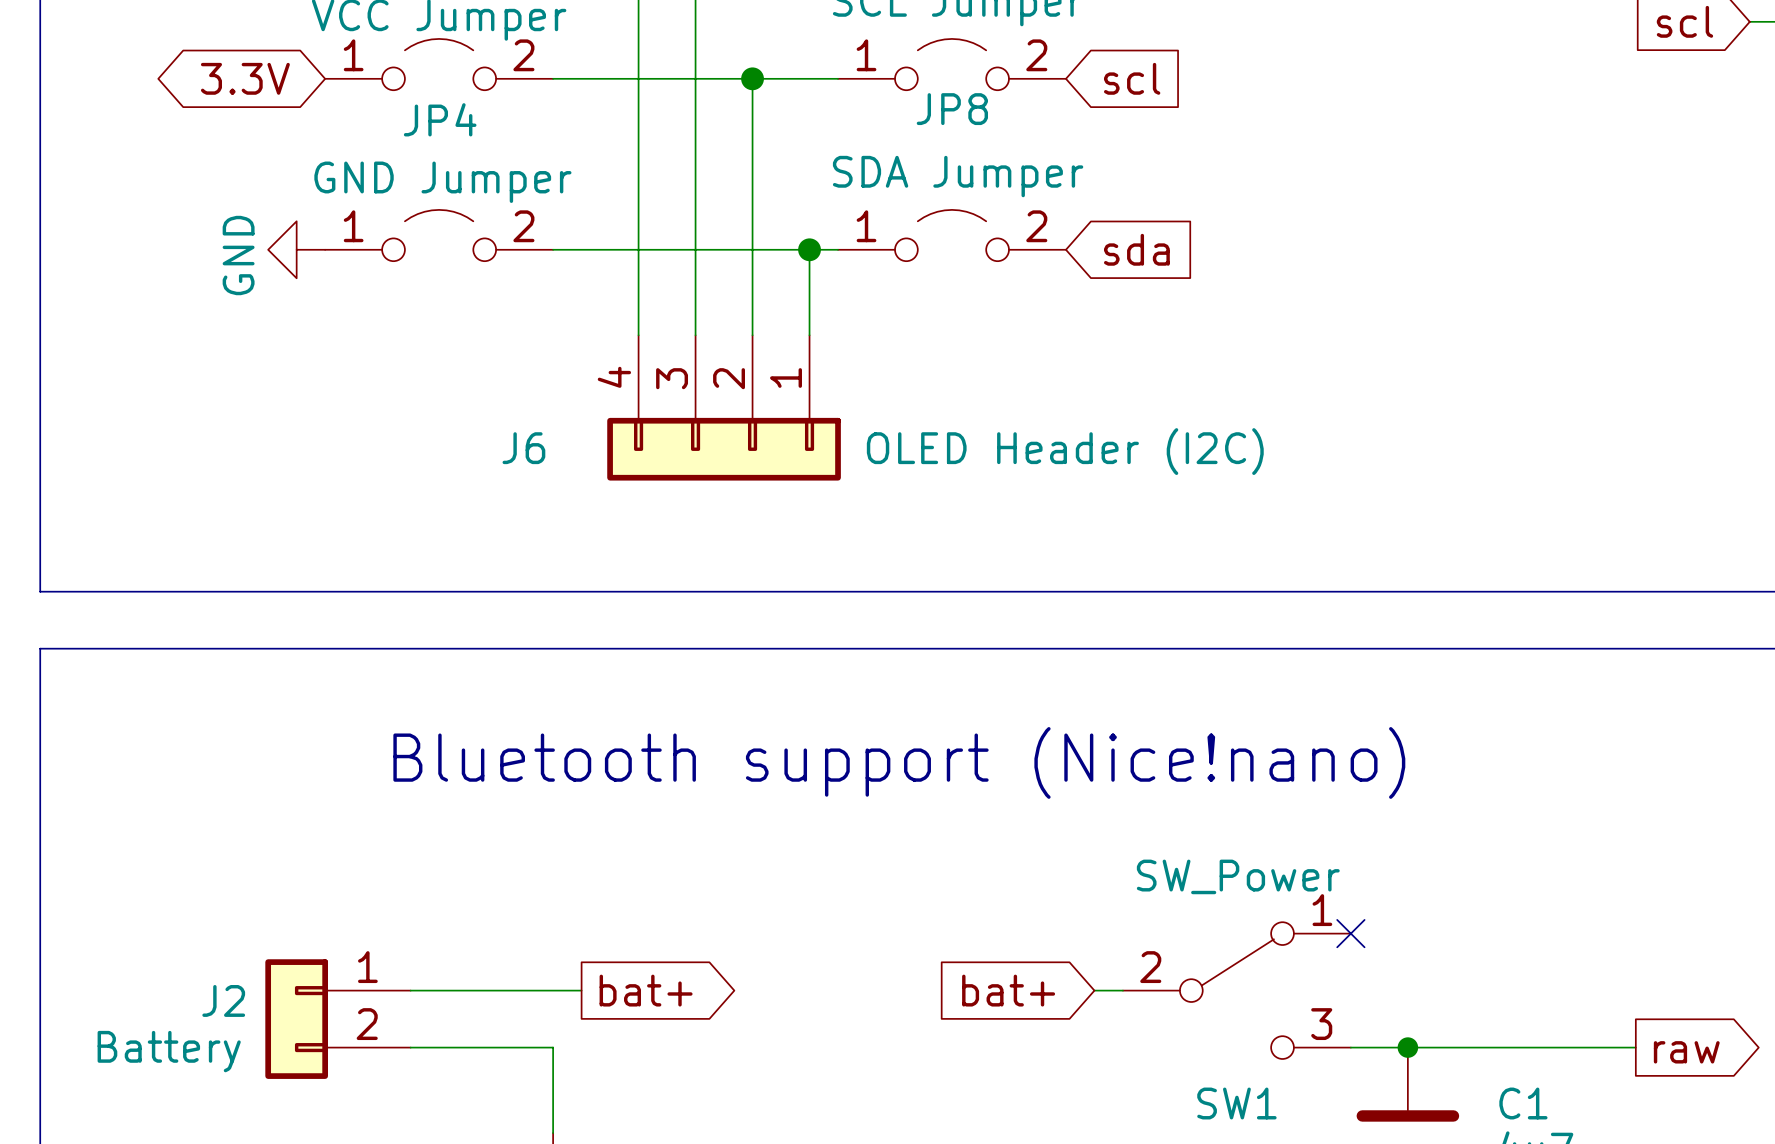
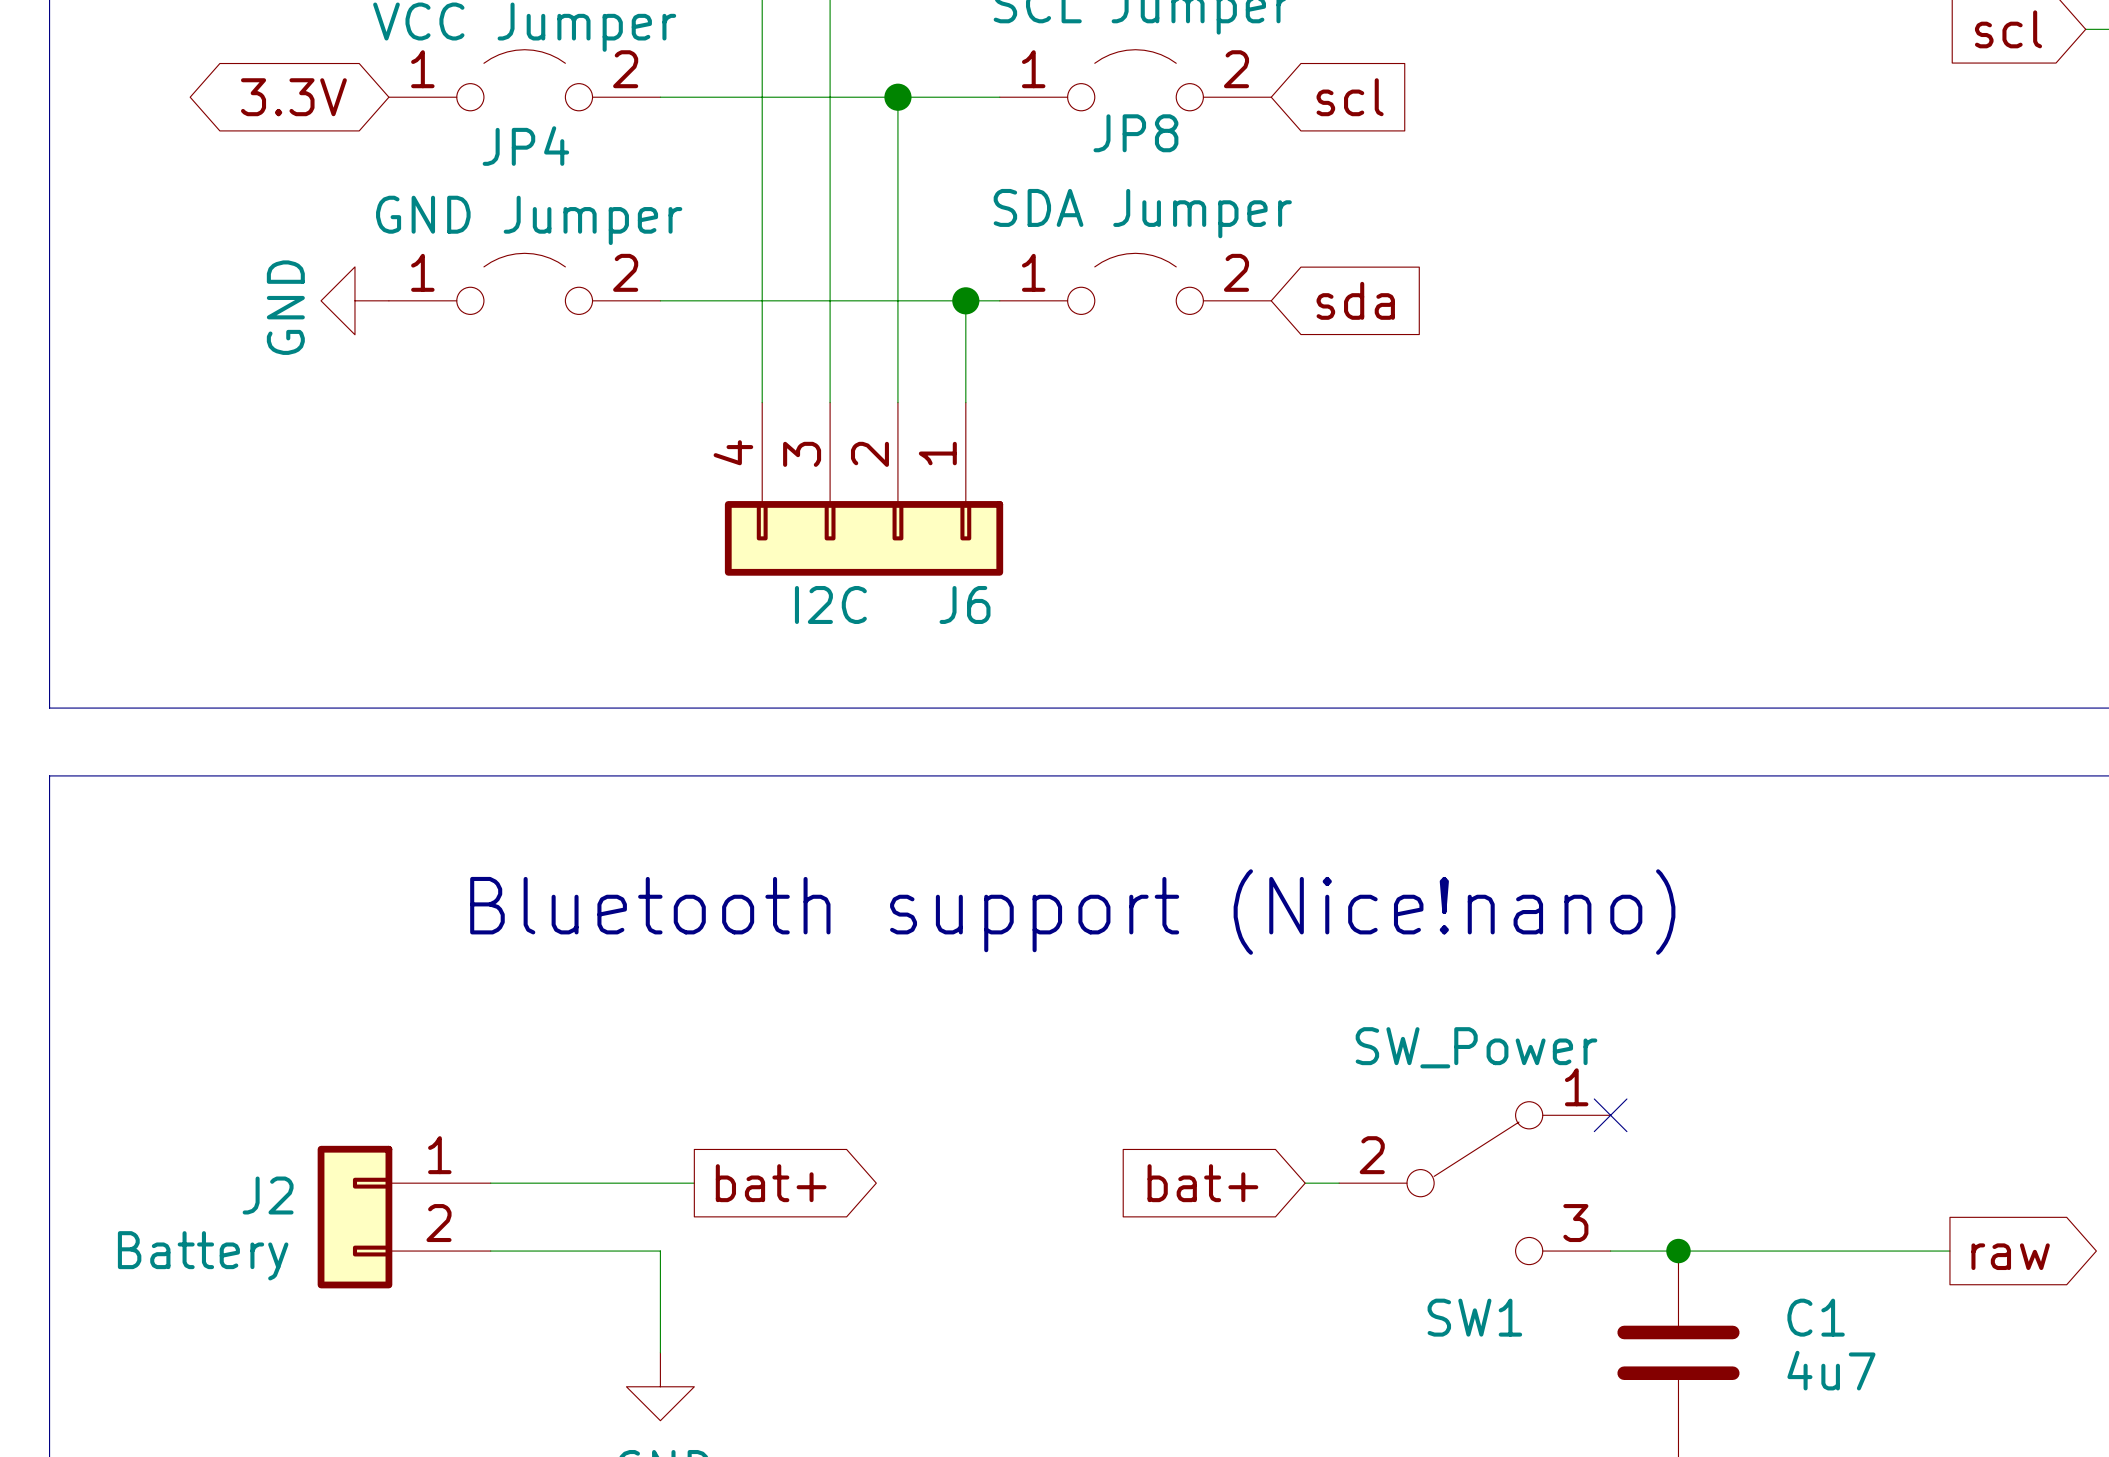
J6 name position: J6 (523, 448) -> J6 (965, 604)
J6 value: OLED Header (I2C) (1065, 451) -> I2C (830, 604)

